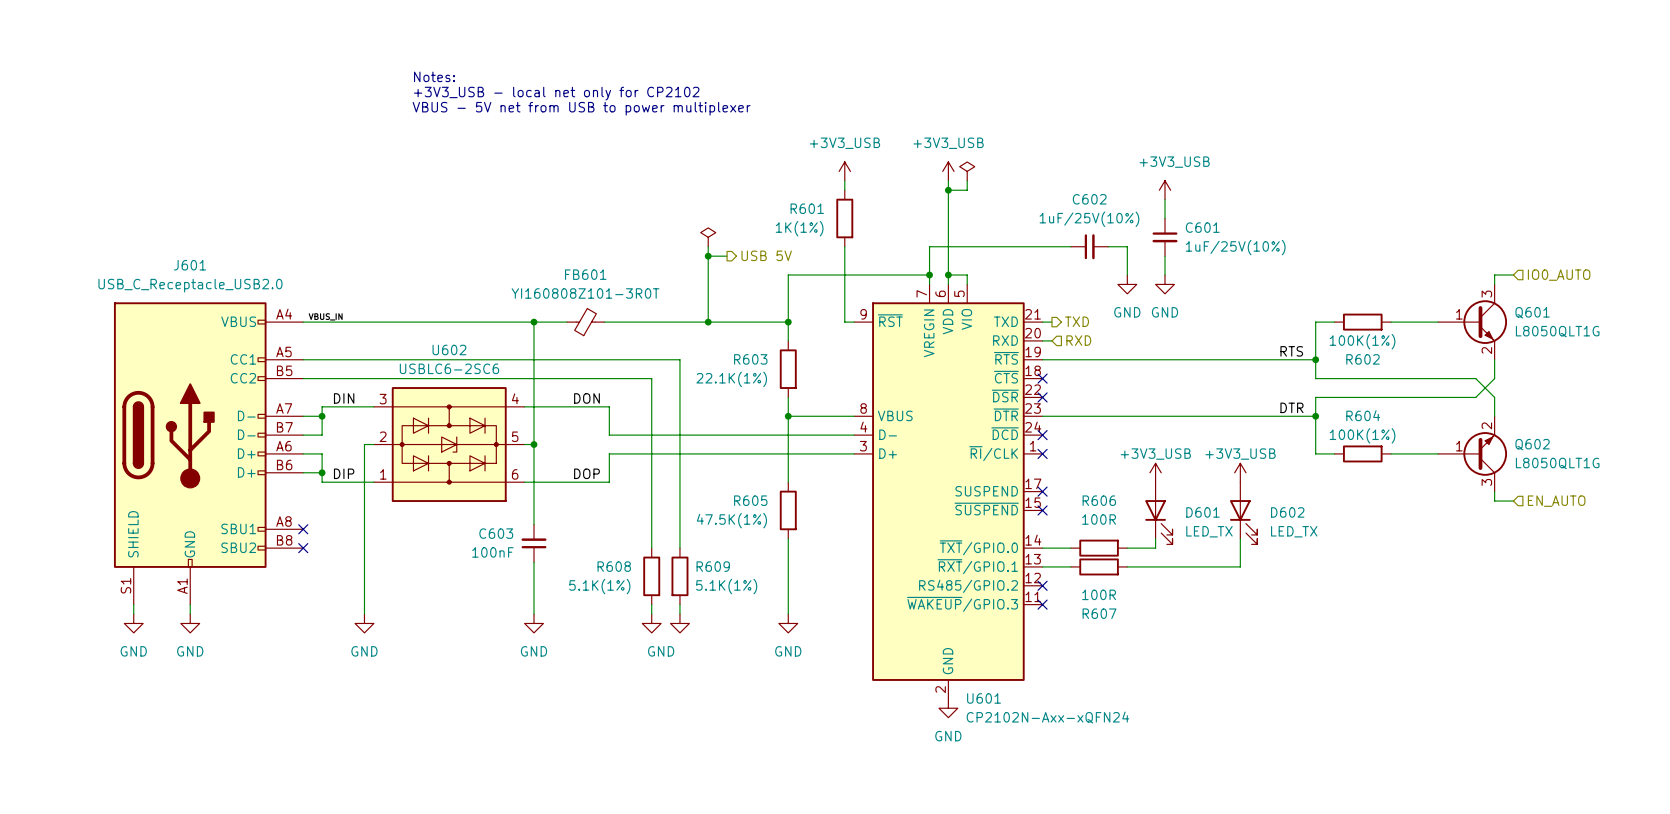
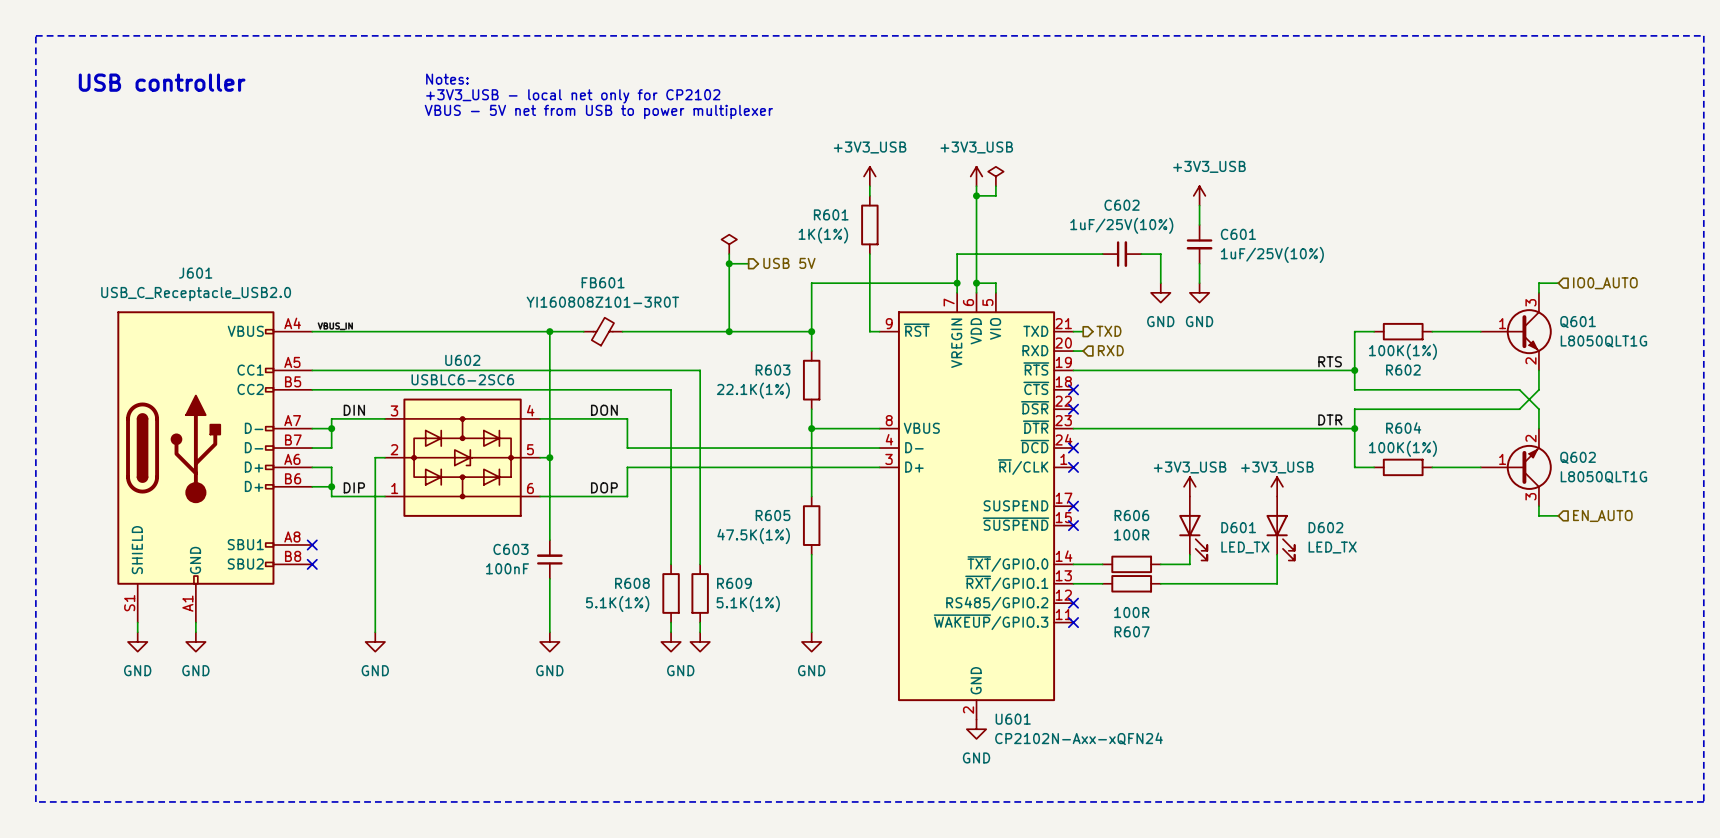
line: none -> (35, 35) (1703, 35) (1703, 801) (35, 801) (35, 35)
text: none -> USB controller (162, 82)

